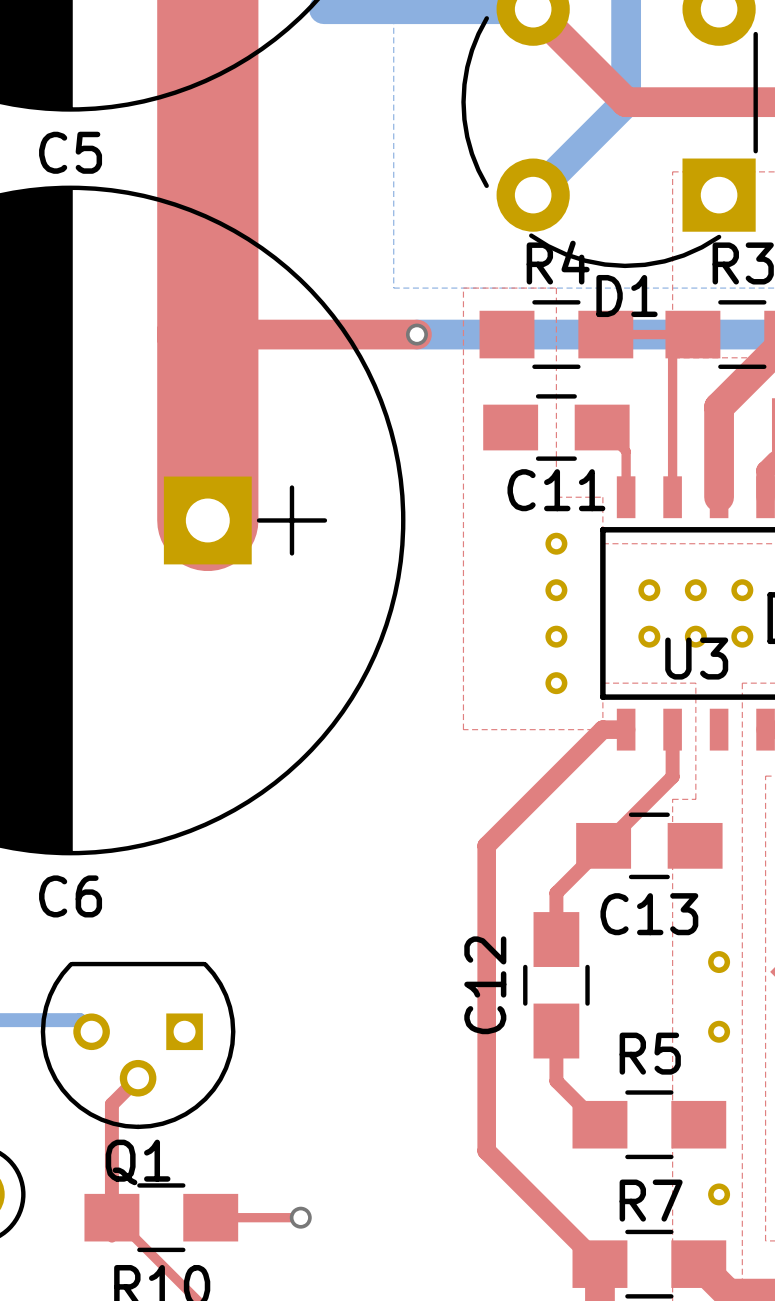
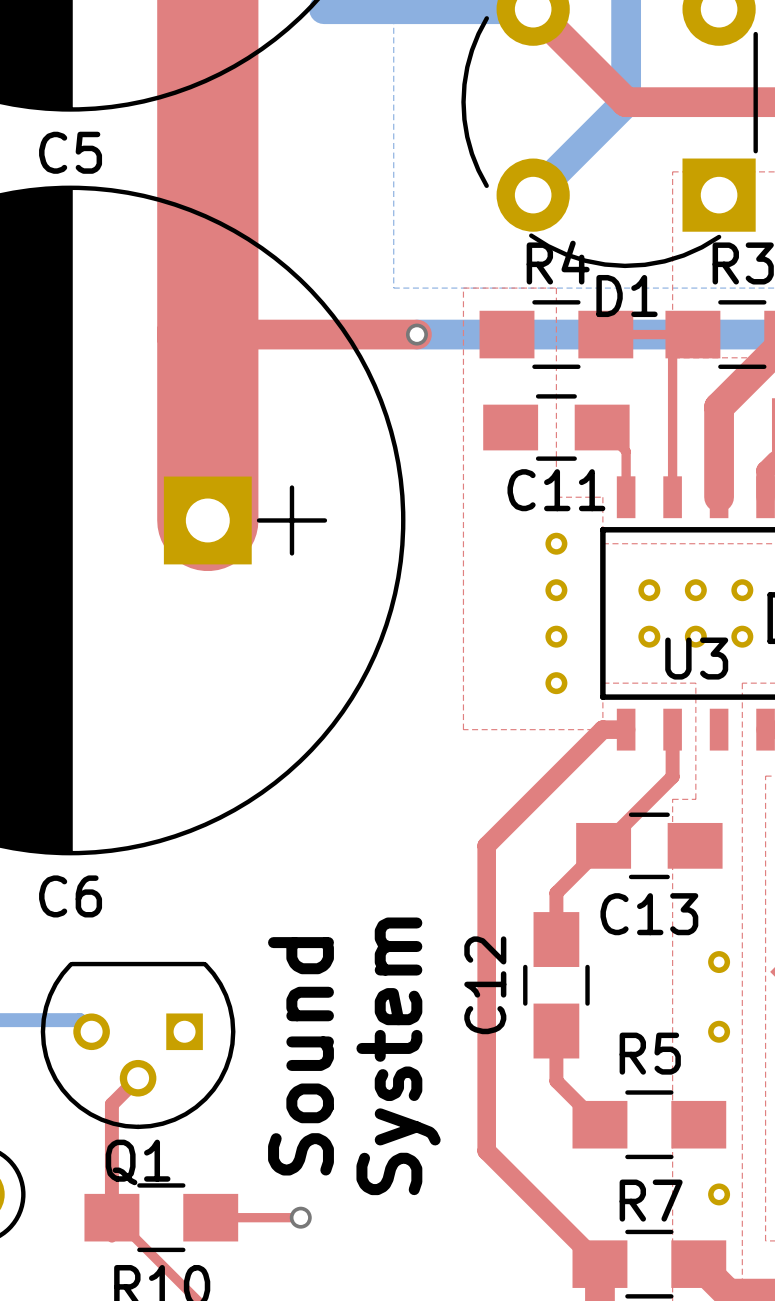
text: none -> Sound (301, 1056)
text: none -> System (398, 1056)

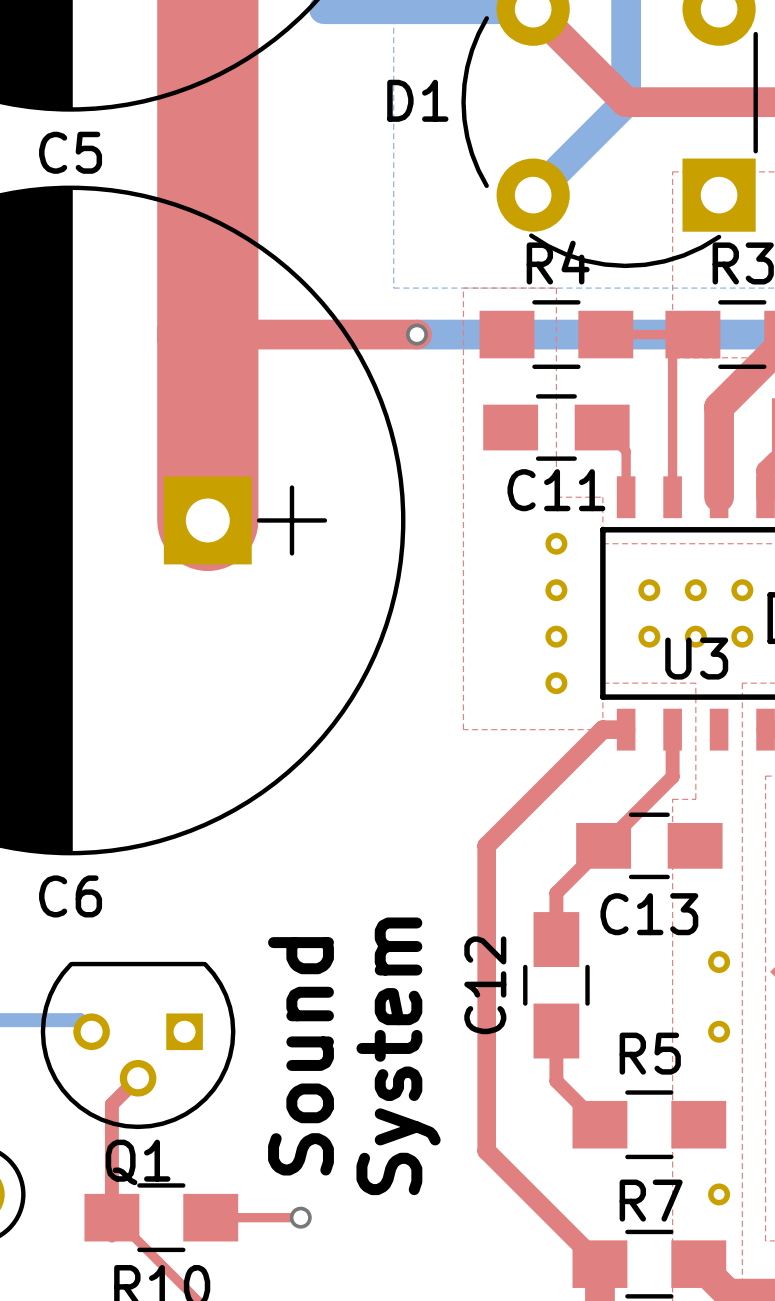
D1 name position: D1 (627, 296) -> D1 (417, 100)

